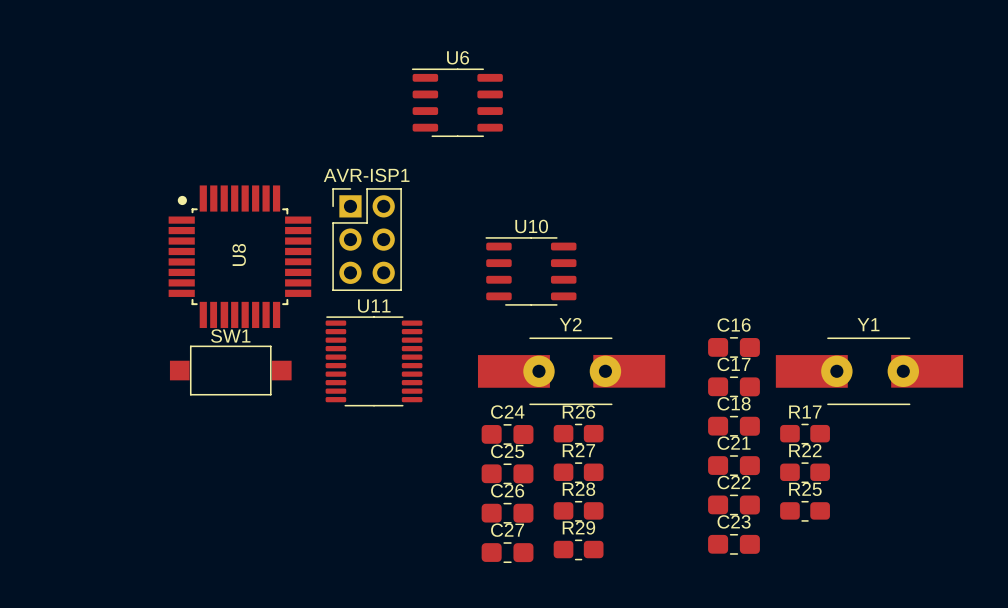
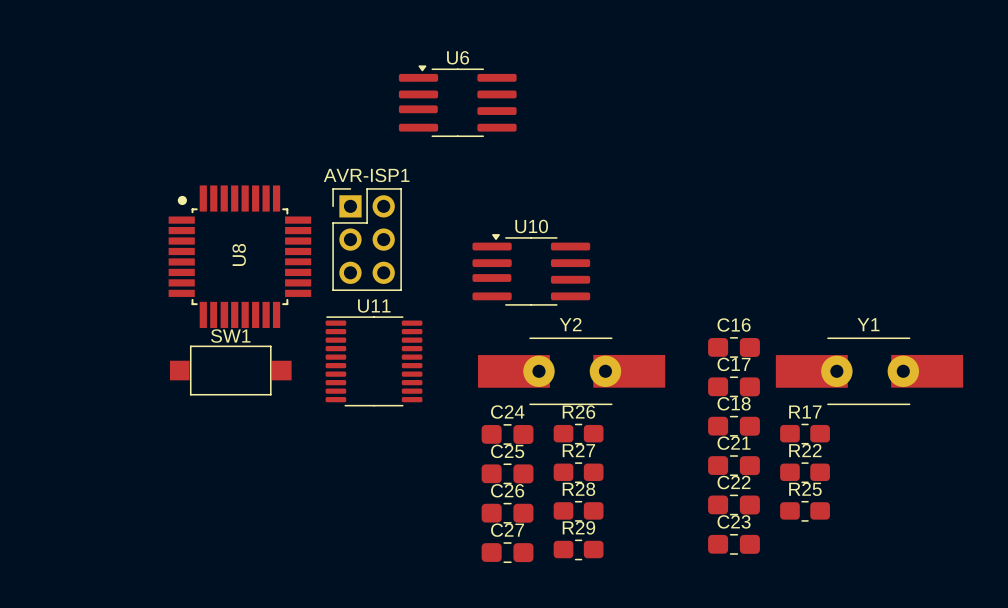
U6 footprint: [411, 68, 503, 138] -> [398, 65, 517, 138]
U10 footprint: [485, 237, 577, 306] -> [472, 234, 591, 306]

